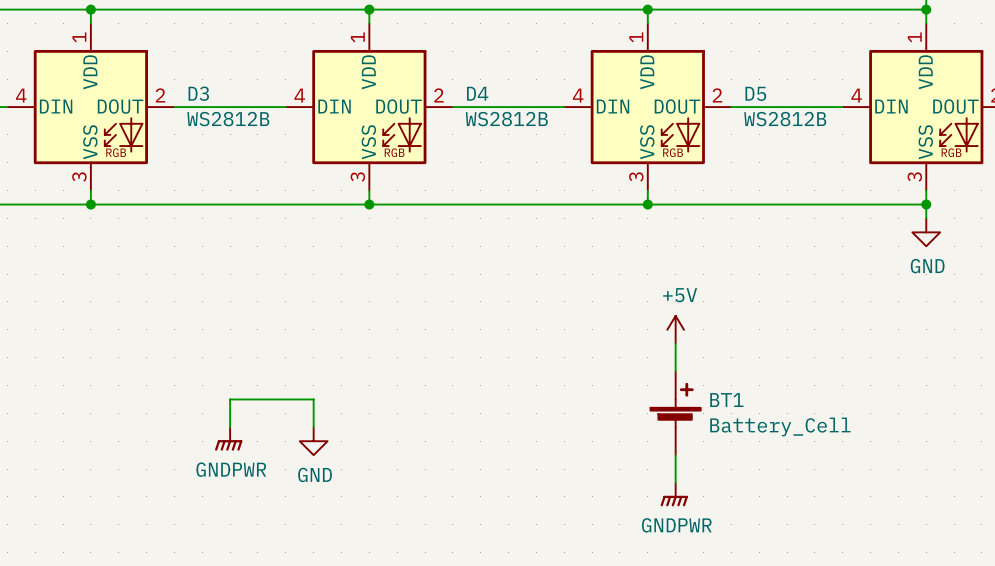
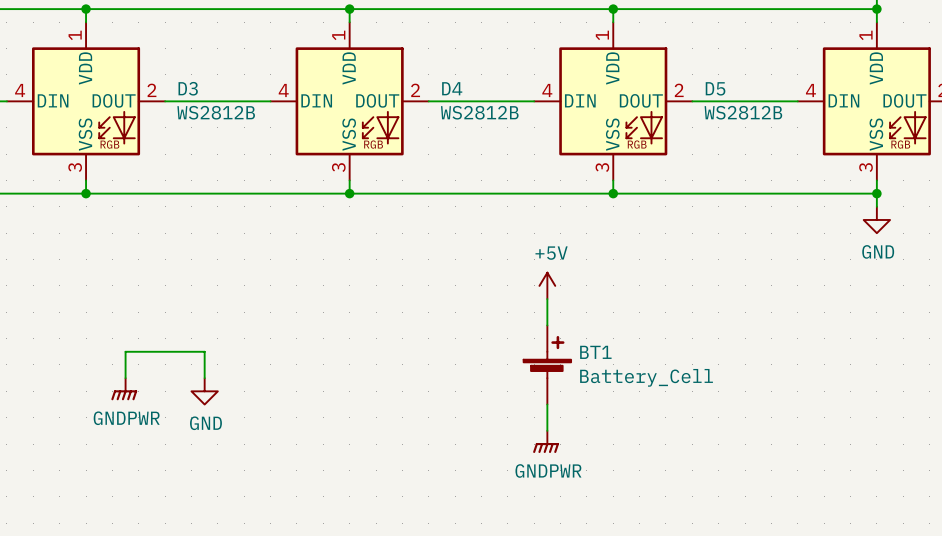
power symbol position: +5V (675, 329) -> +5V (547, 285)
wire: (675, 343) (675, 371) -> (547, 299) (547, 325)
BT1 position: (675, 413) -> (547, 364)
wire: (230, 427) (230, 399) (313, 399) (313, 427) -> (125, 378) (125, 351) (204, 351) (204, 378)
power symbol position: GNDPWR (228, 438) -> GNDPWR (124, 389)
power symbol position: GND (313, 441) -> GND (204, 391)
wire: (675, 455) (675, 482) -> (547, 404) (547, 430)
power symbol position: GNDPWR (674, 494) -> GNDPWR (546, 441)

